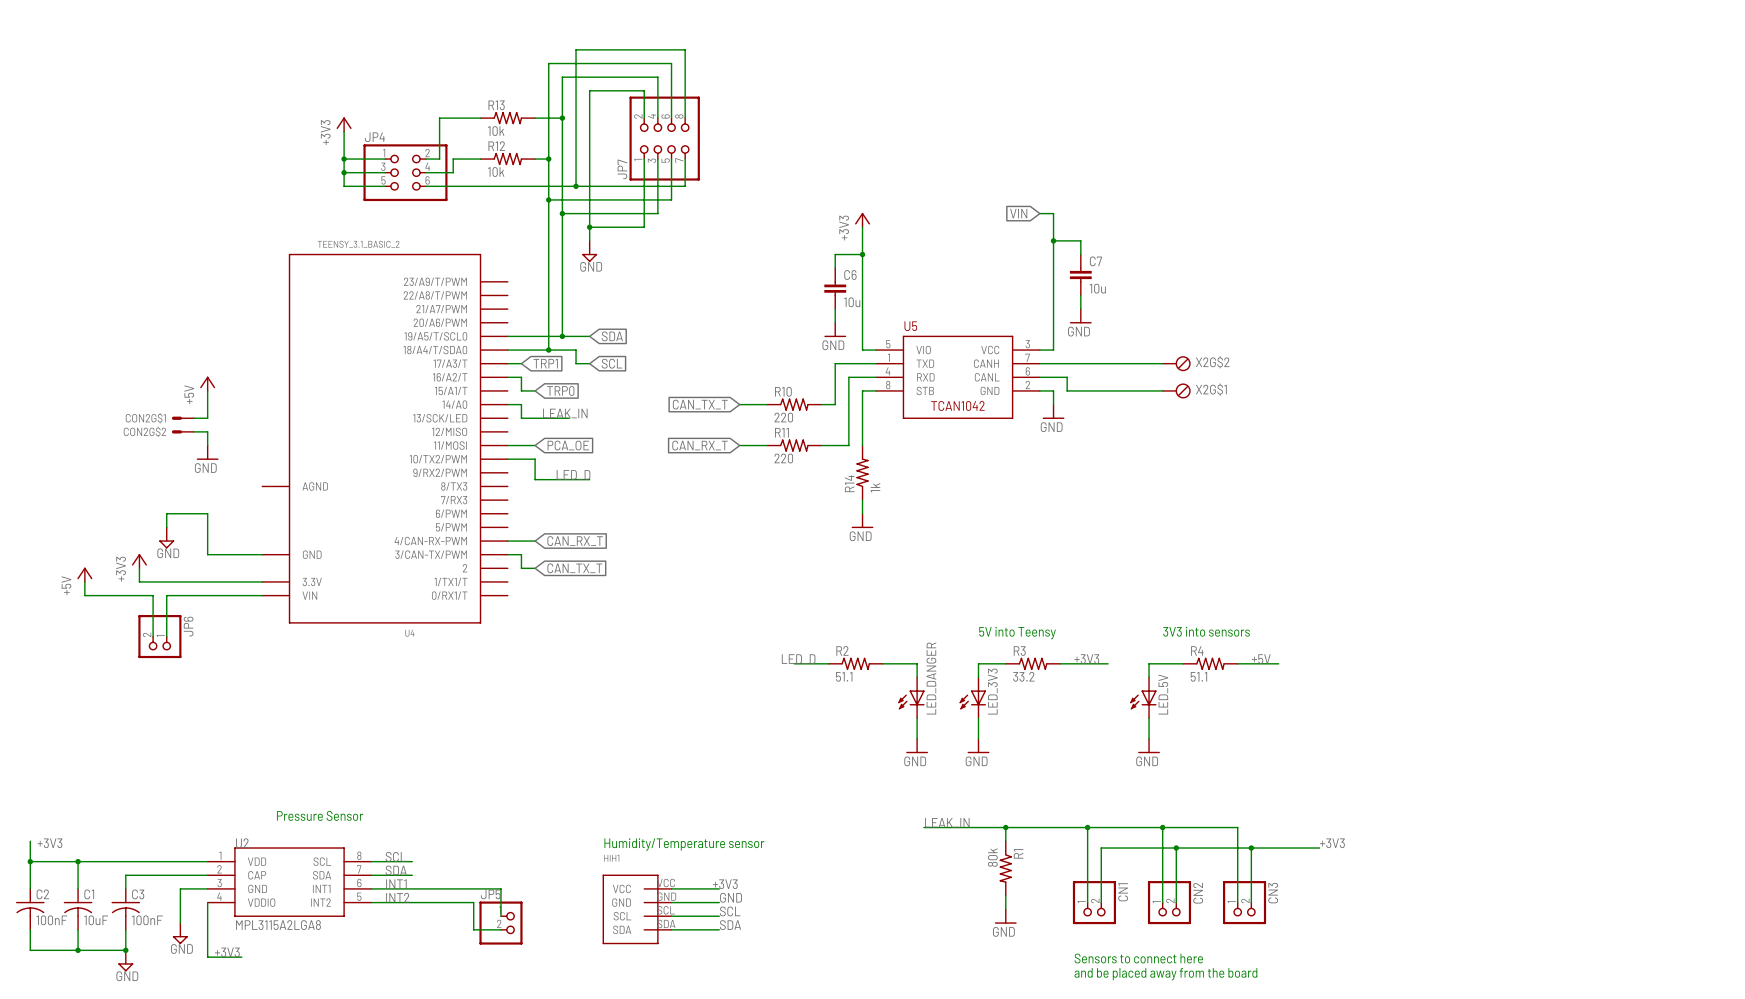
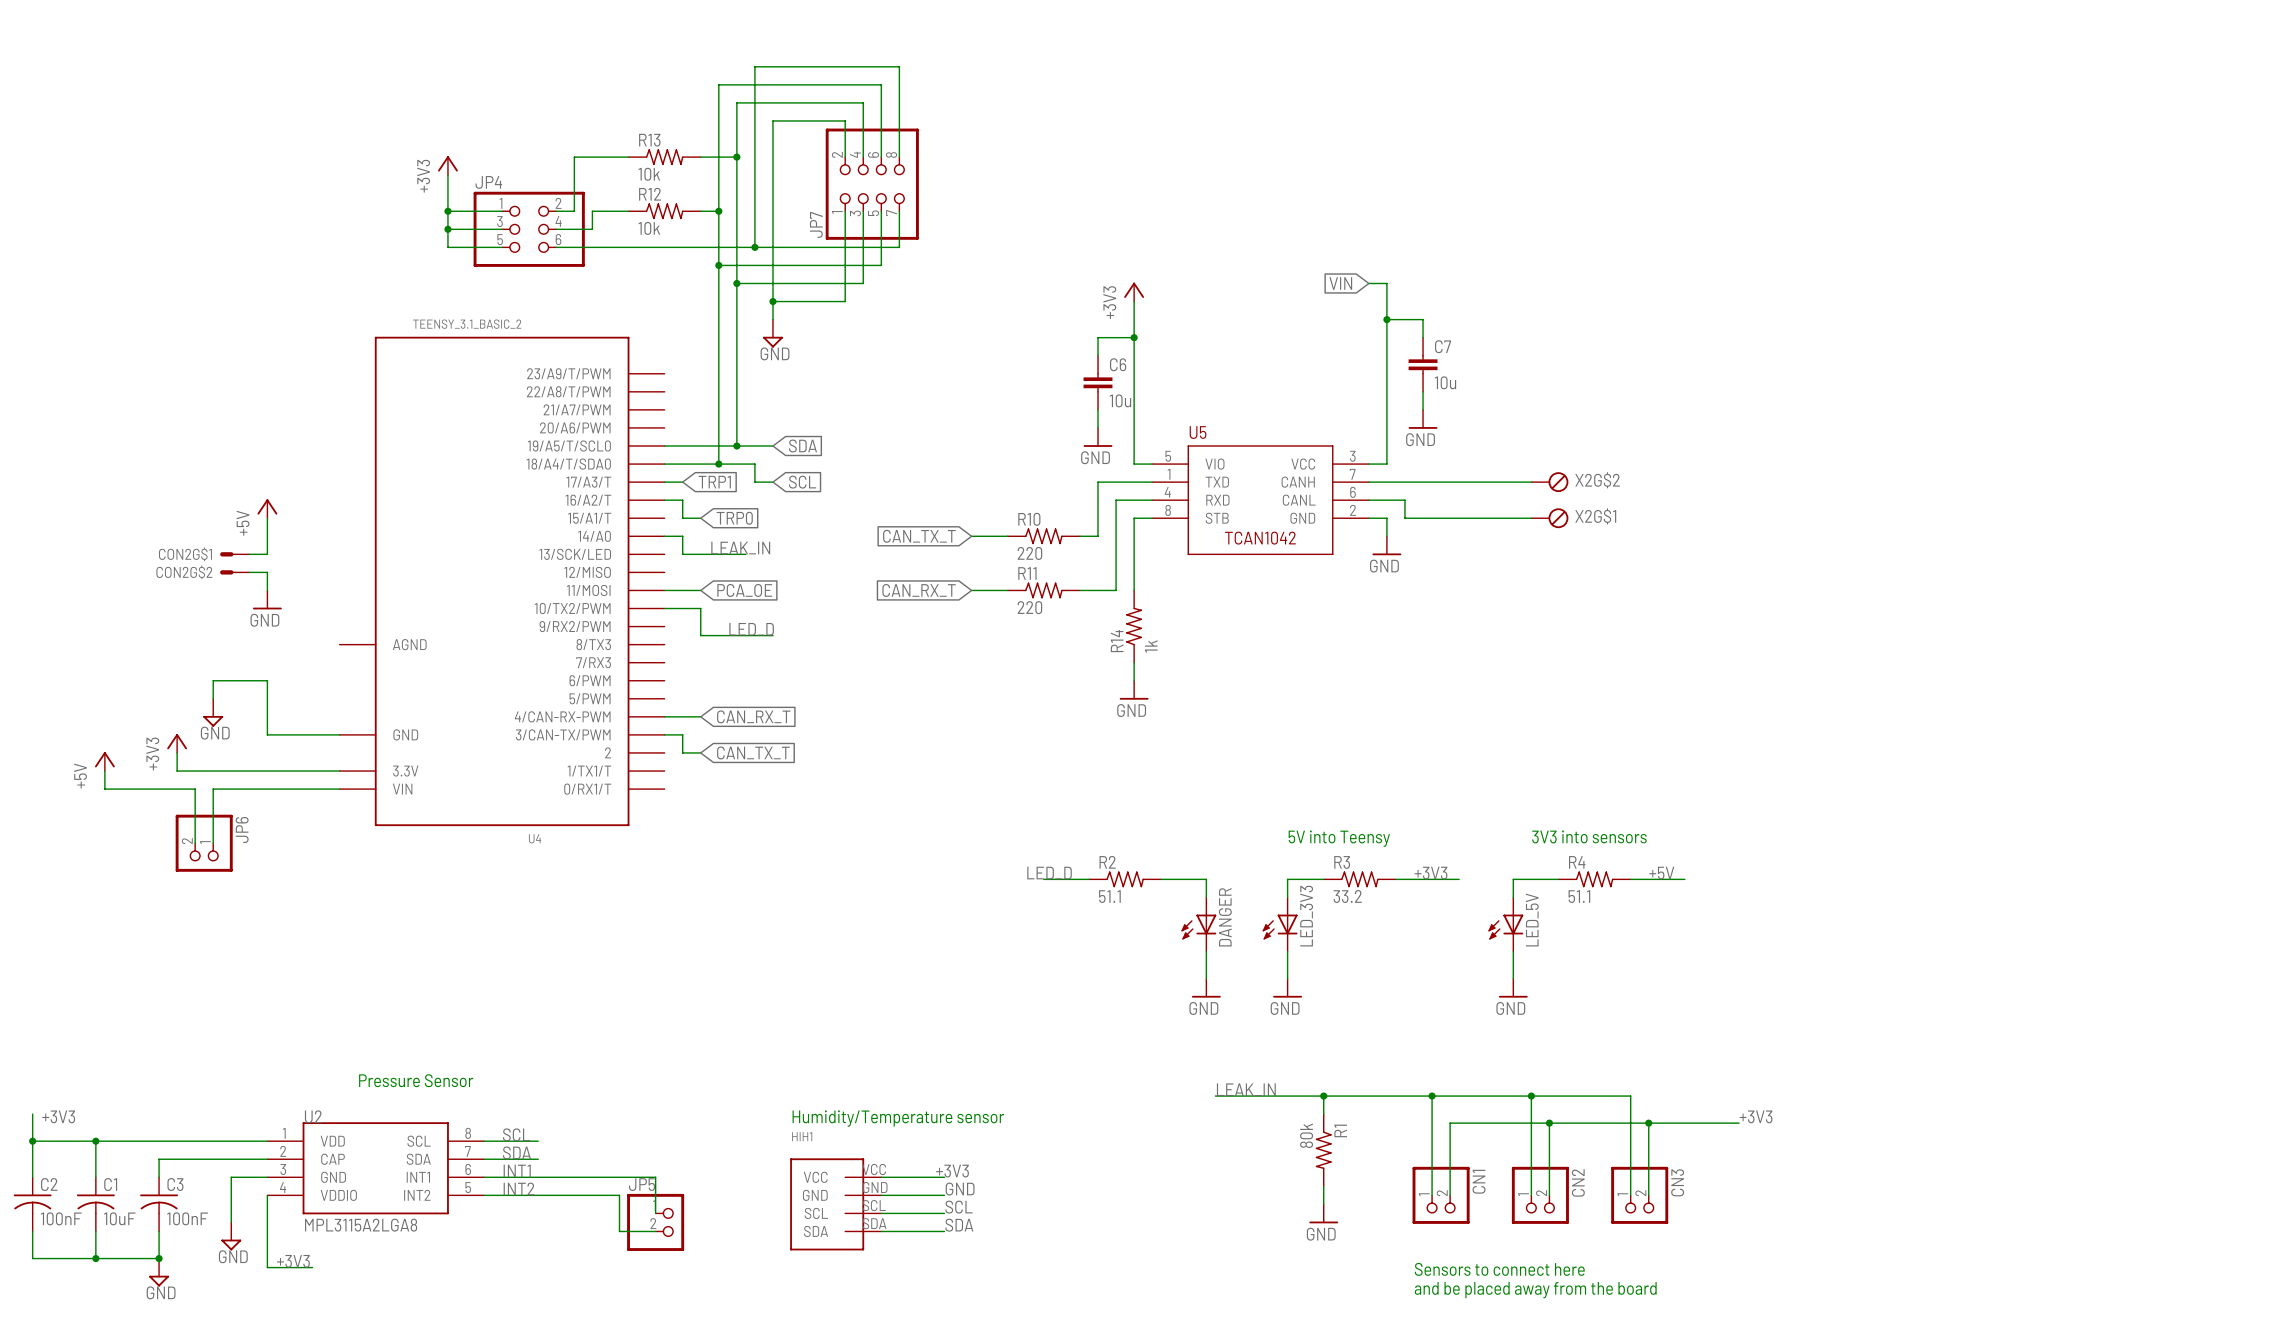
LED_DANGER name: LED_DANGER (931, 678) -> DANGER (1225, 917)

